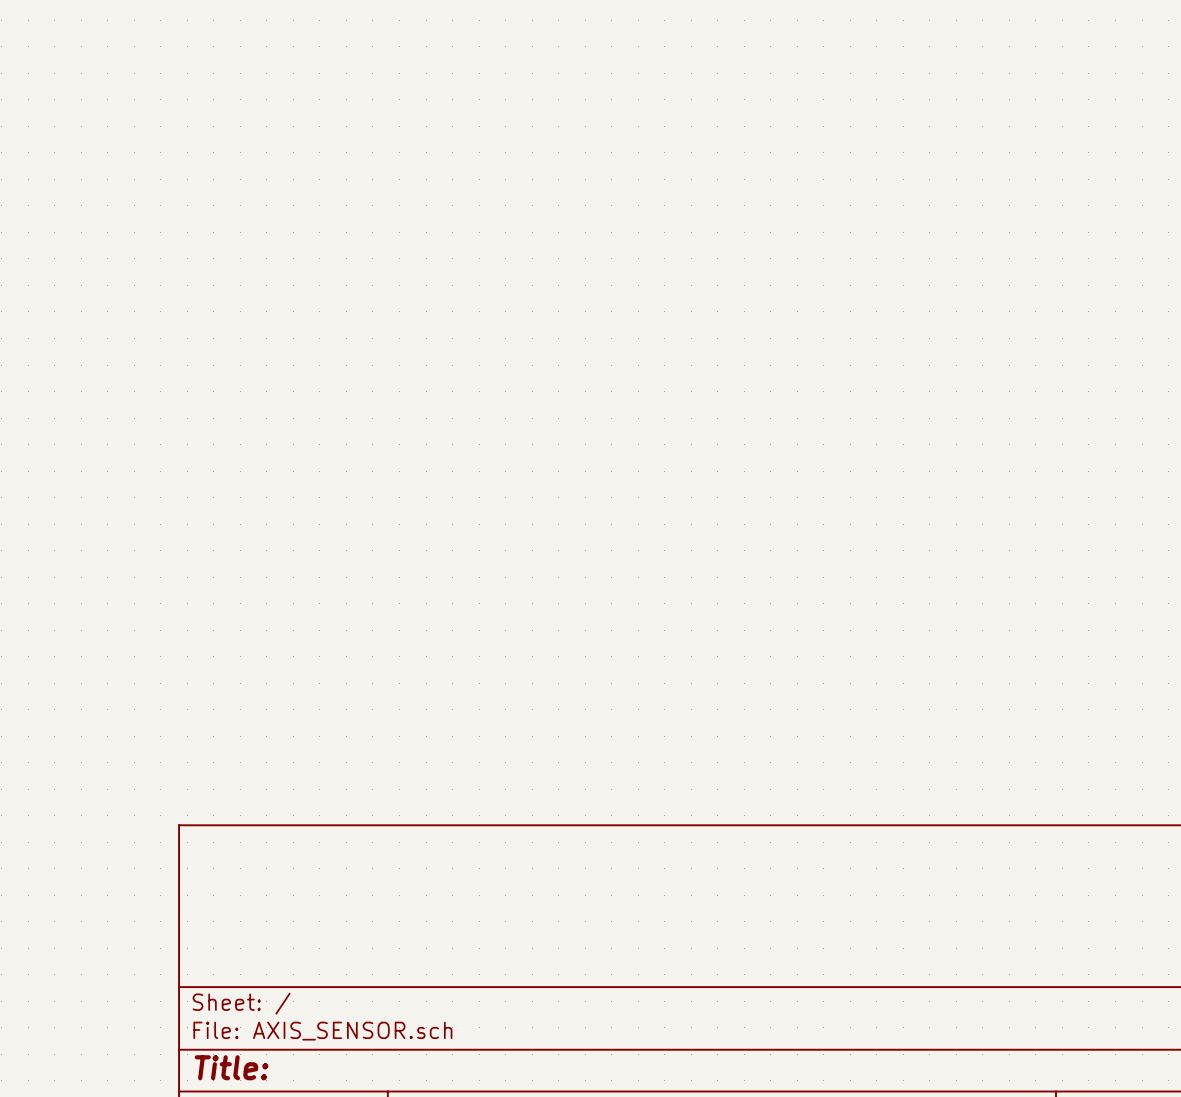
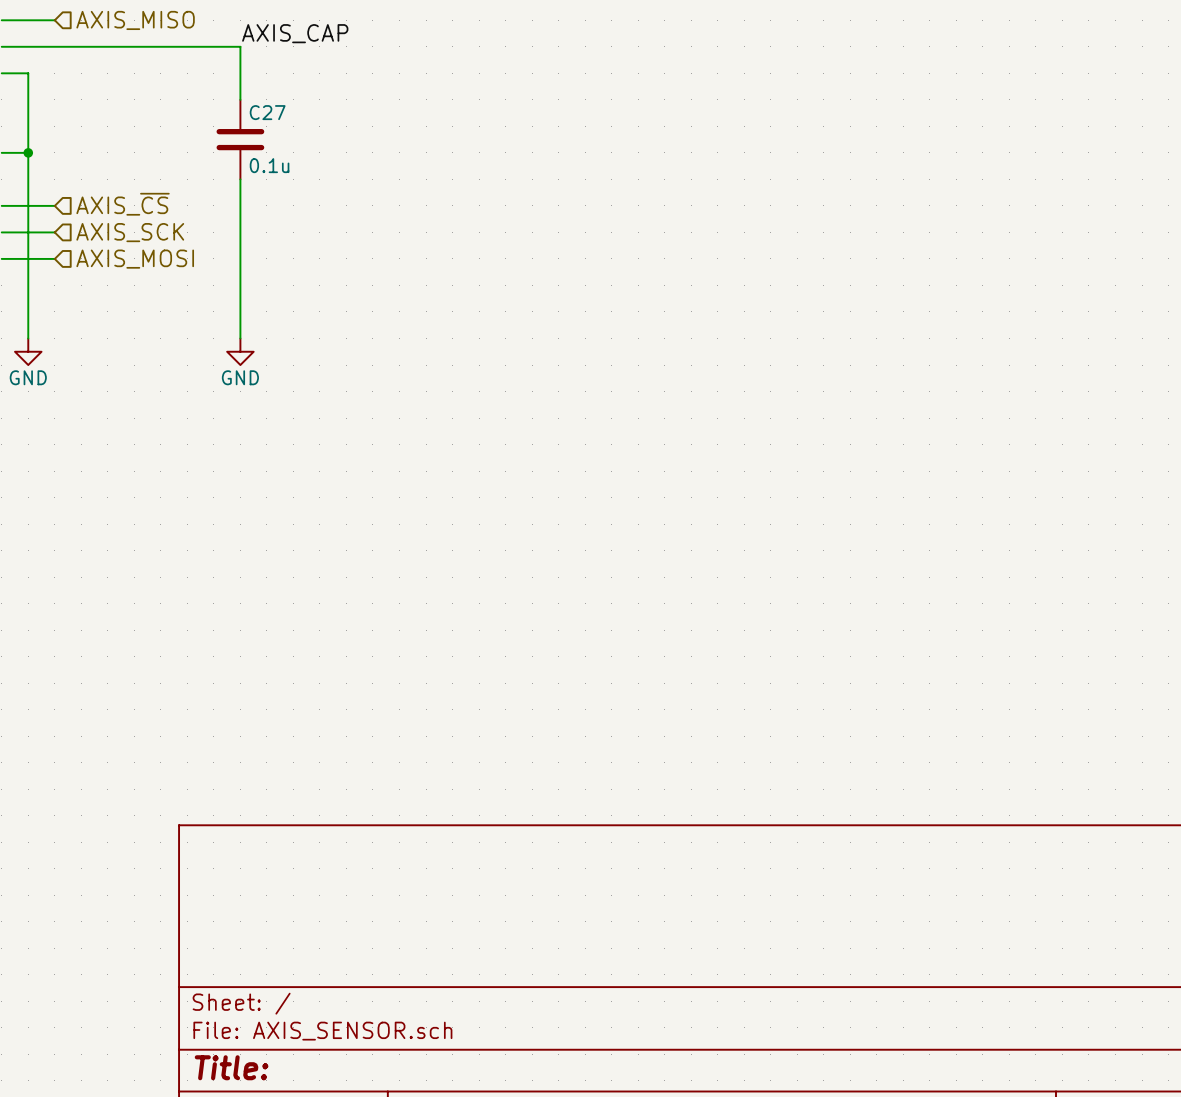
wire: none -> (1, 20) (54, 20)
hierarchical label: none -> AXIS_MISO (135, 20)
label: none -> AXIS_CAP (295, 33)
wire: none -> (1, 46) (240, 46) (240, 99)
wire: none -> (1, 73) (28, 73) (28, 338)
C27: none -> 0.1u (240, 139)
wire: none -> (1, 152) (28, 152)
junction: none -> (28, 152)
wire: none -> (240, 179) (240, 338)
hierarchical label: none -> AXIS_~{CS} (123, 204)
wire: none -> (1, 205) (54, 205)
wire: none -> (1, 232) (54, 232)
hierarchical label: none -> AXIS_SCK (130, 232)
wire: none -> (1, 258) (54, 258)
hierarchical label: none -> AXIS_MOSI (135, 259)
power symbol: none -> GND (28, 351)
power symbol: none -> GND (240, 351)

